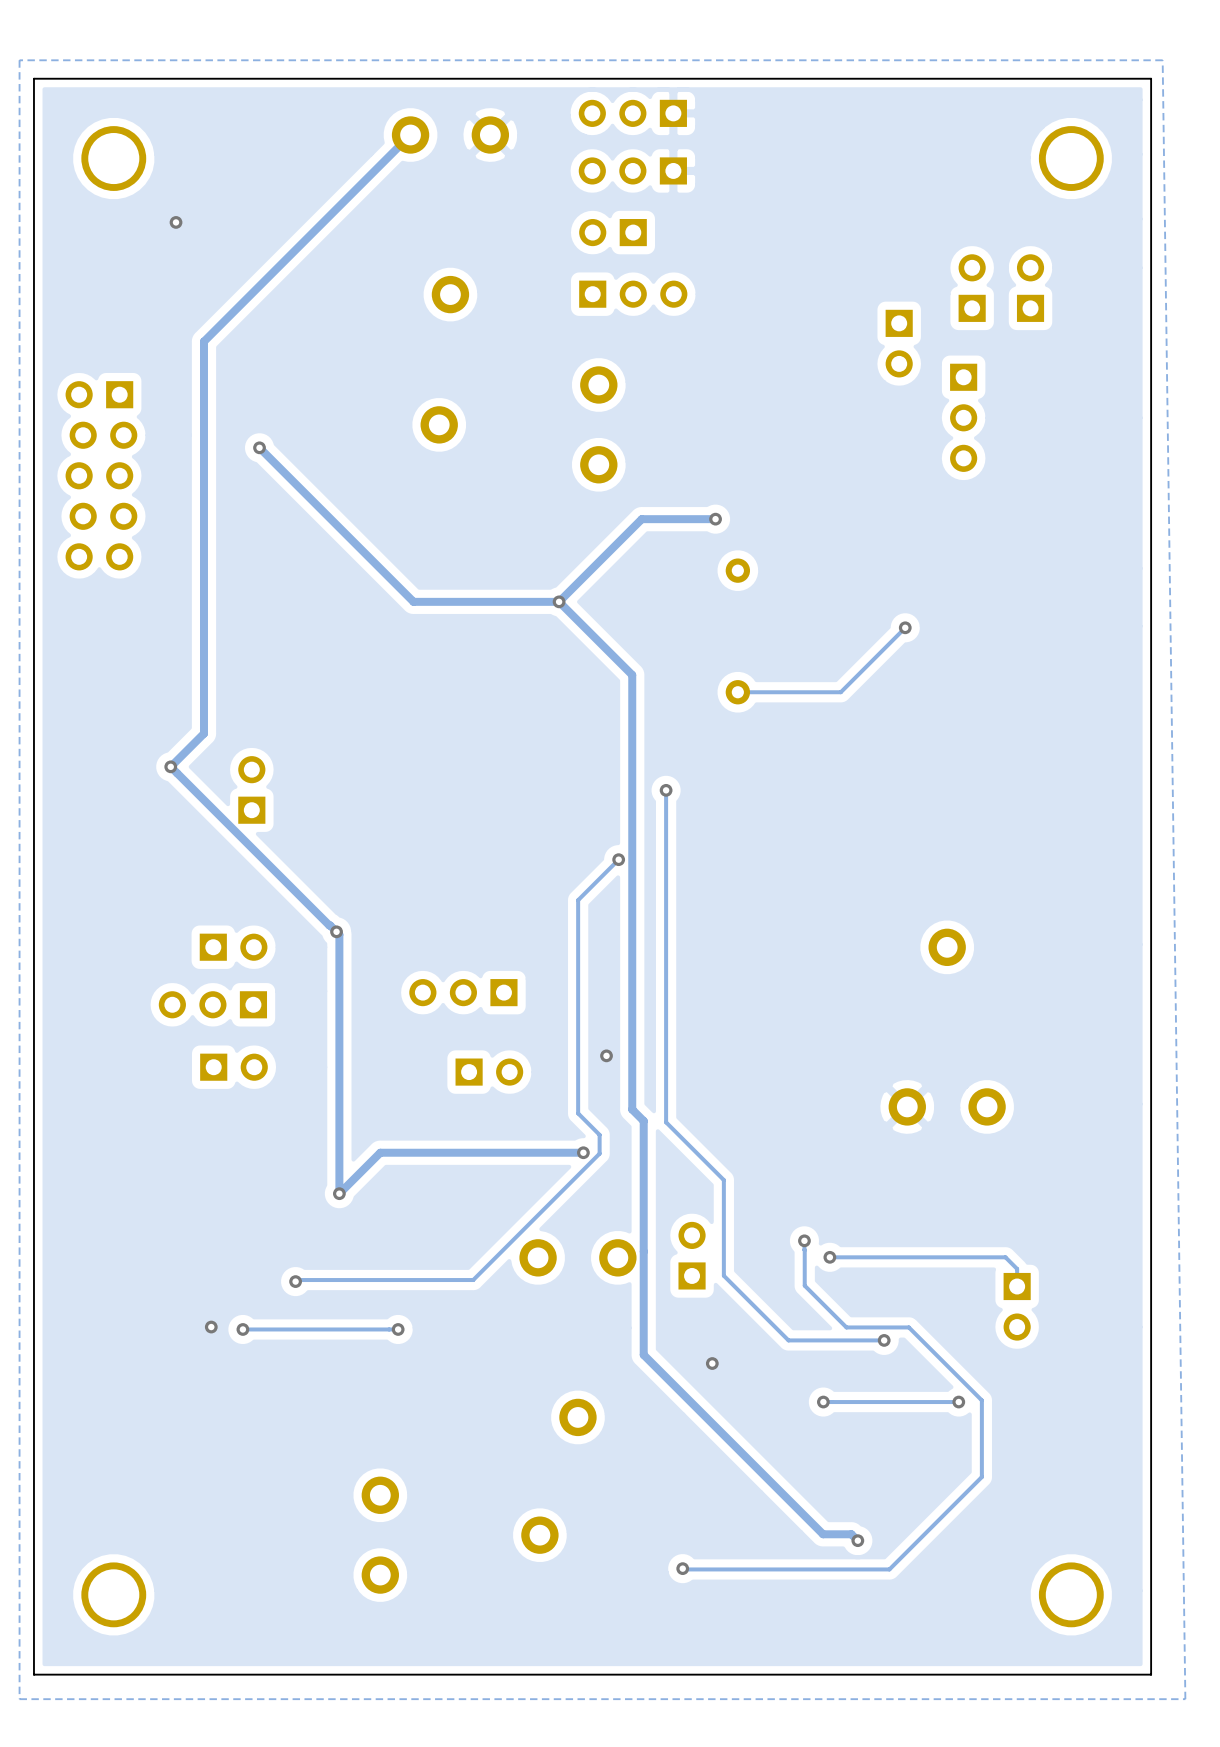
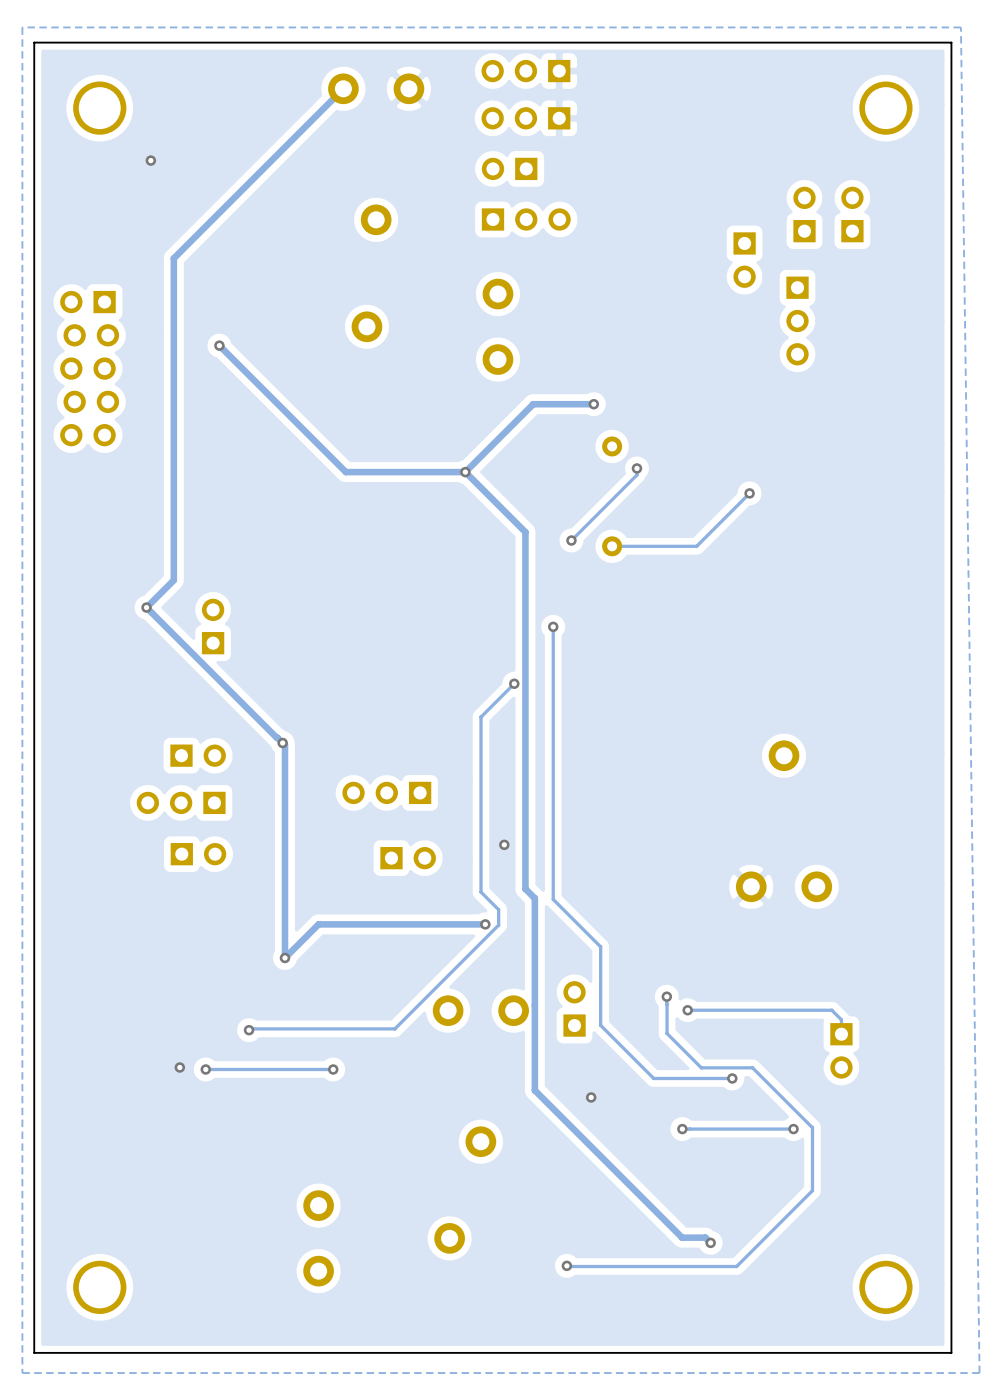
track: none -> (636, 468) (636, 475) (571, 540)
via: none -> (636, 468)
via: none -> (571, 540)

